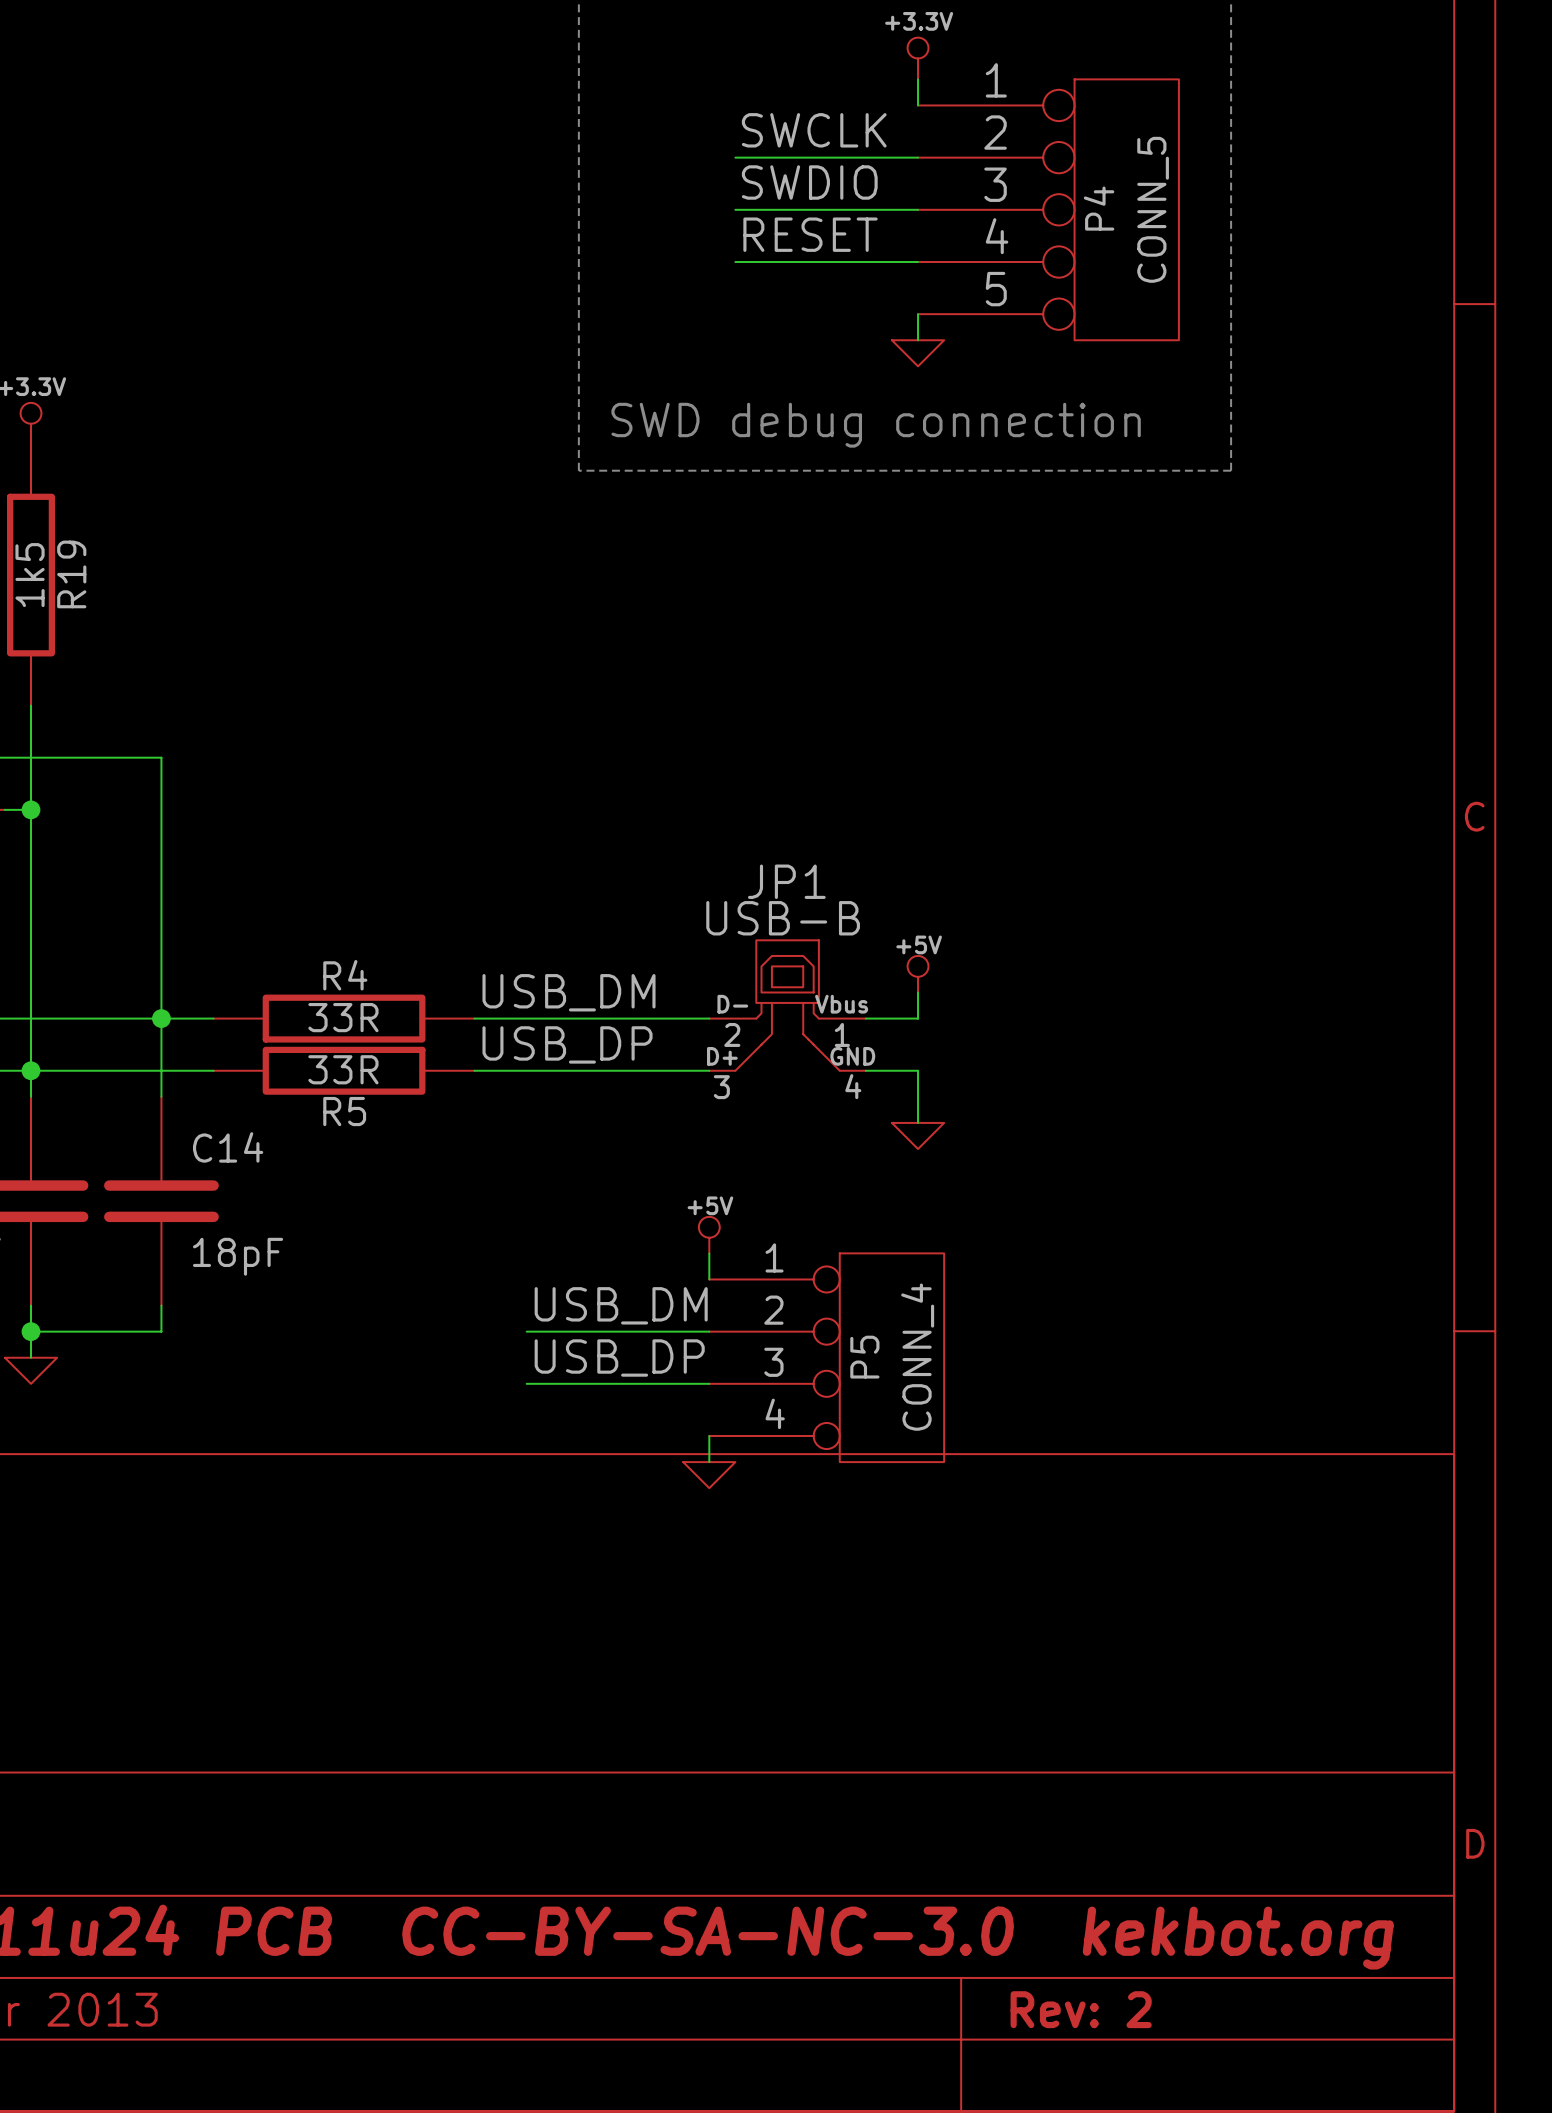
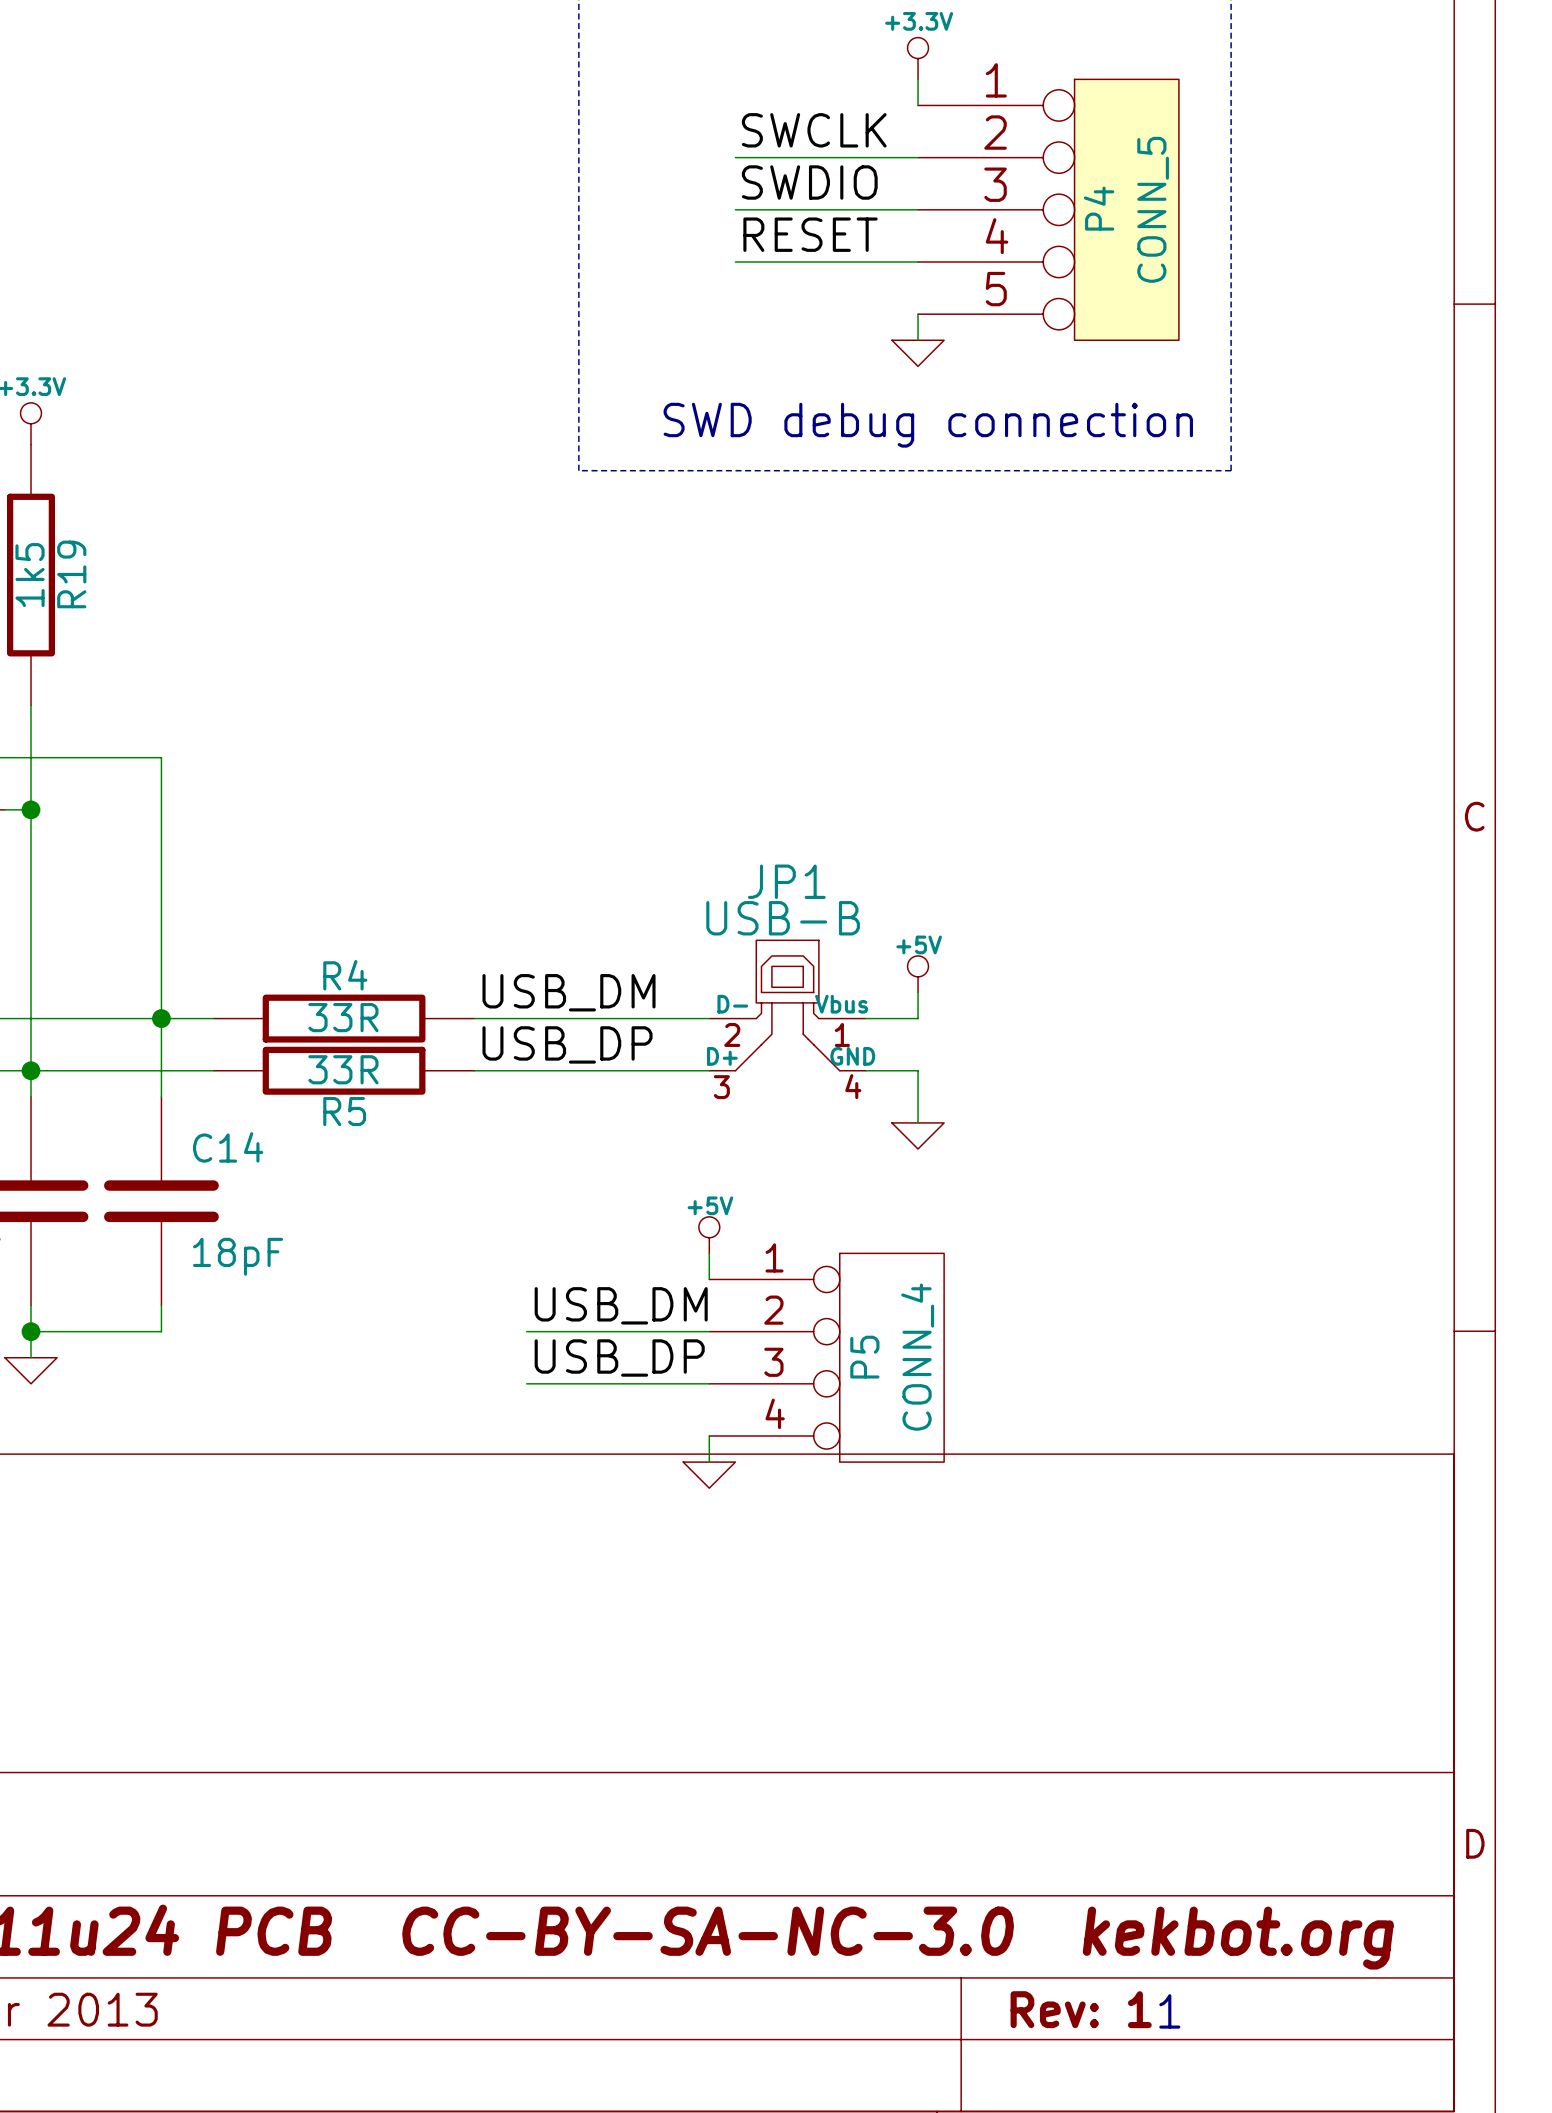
text position: SWD debug connection (876, 425) -> SWD debug connection (928, 425)
title block: Rev: 2 (1081, 2009) -> Rev: 1 (1081, 2009)
text: none -> 1 (1169, 2011)

